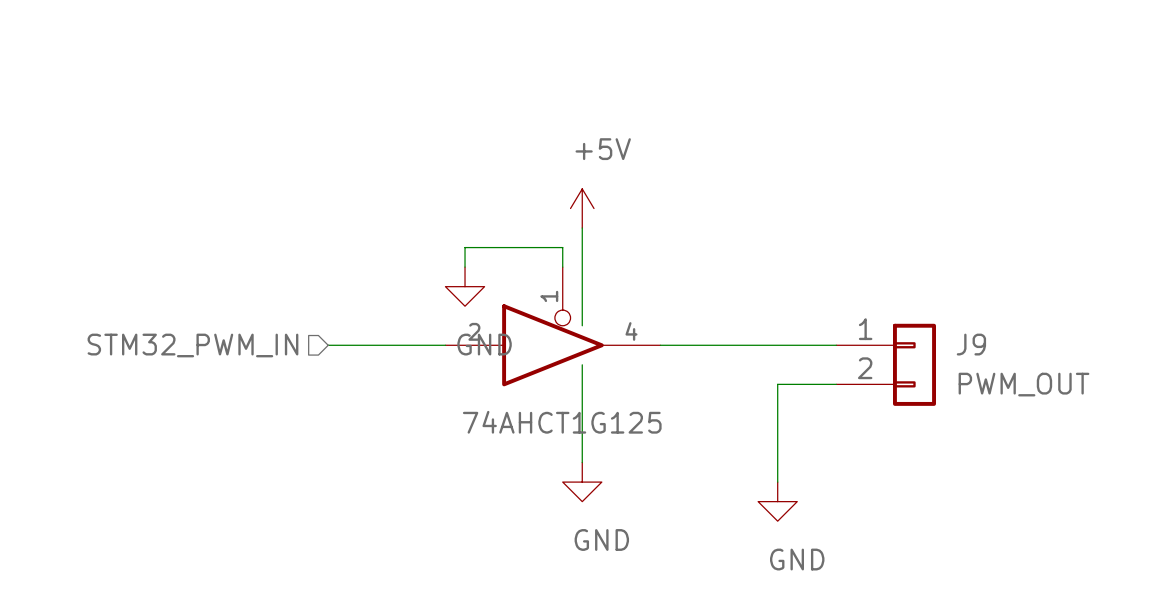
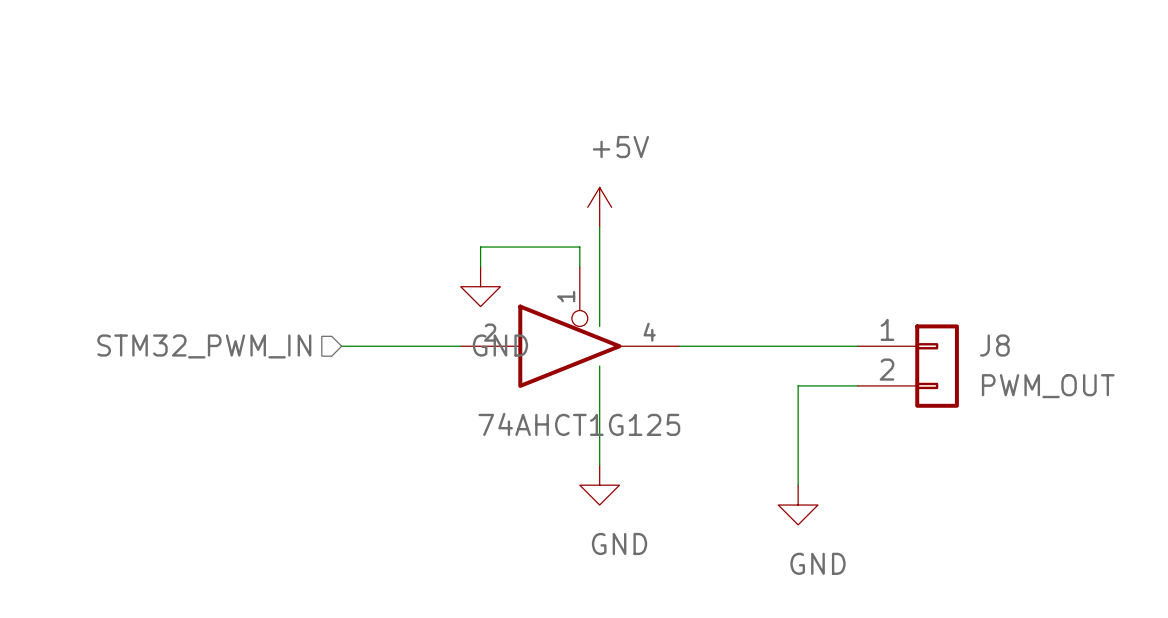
J9 name: J9 (971, 344) -> J8 (994, 345)

